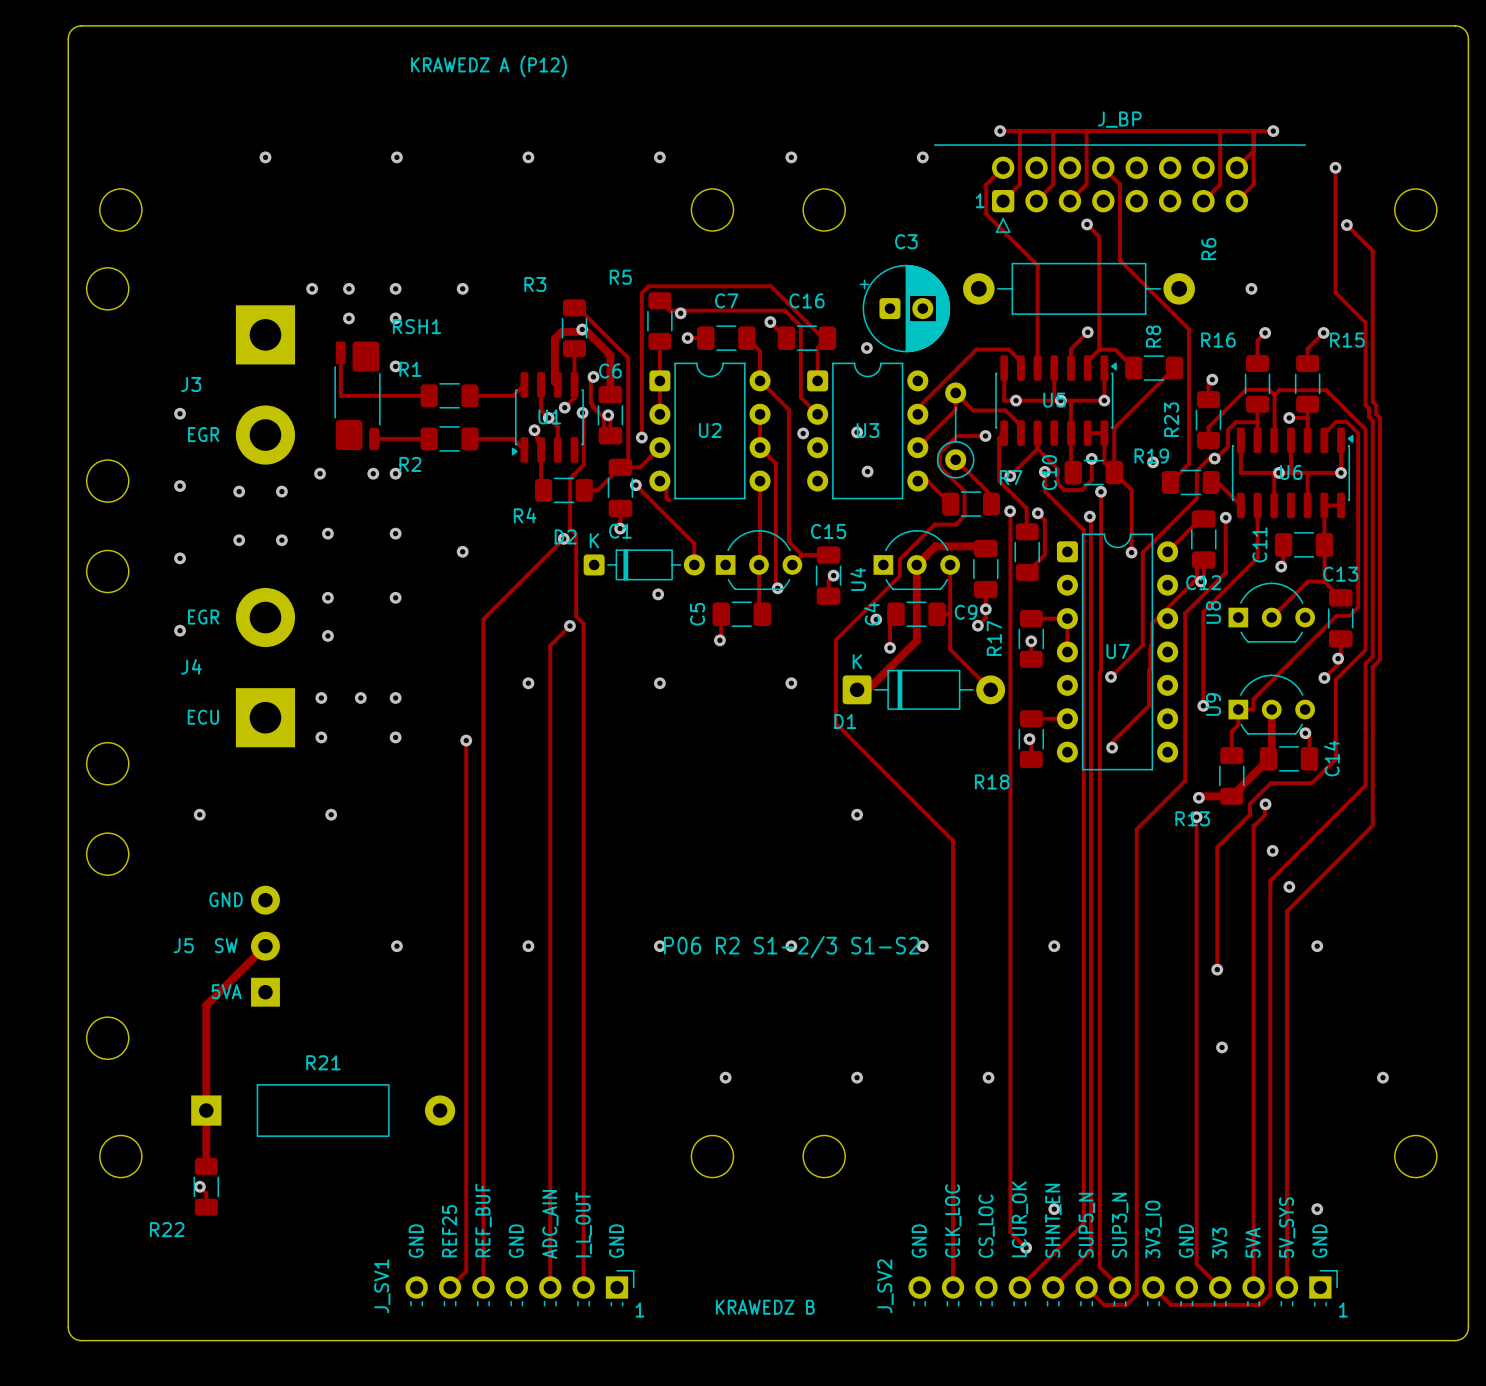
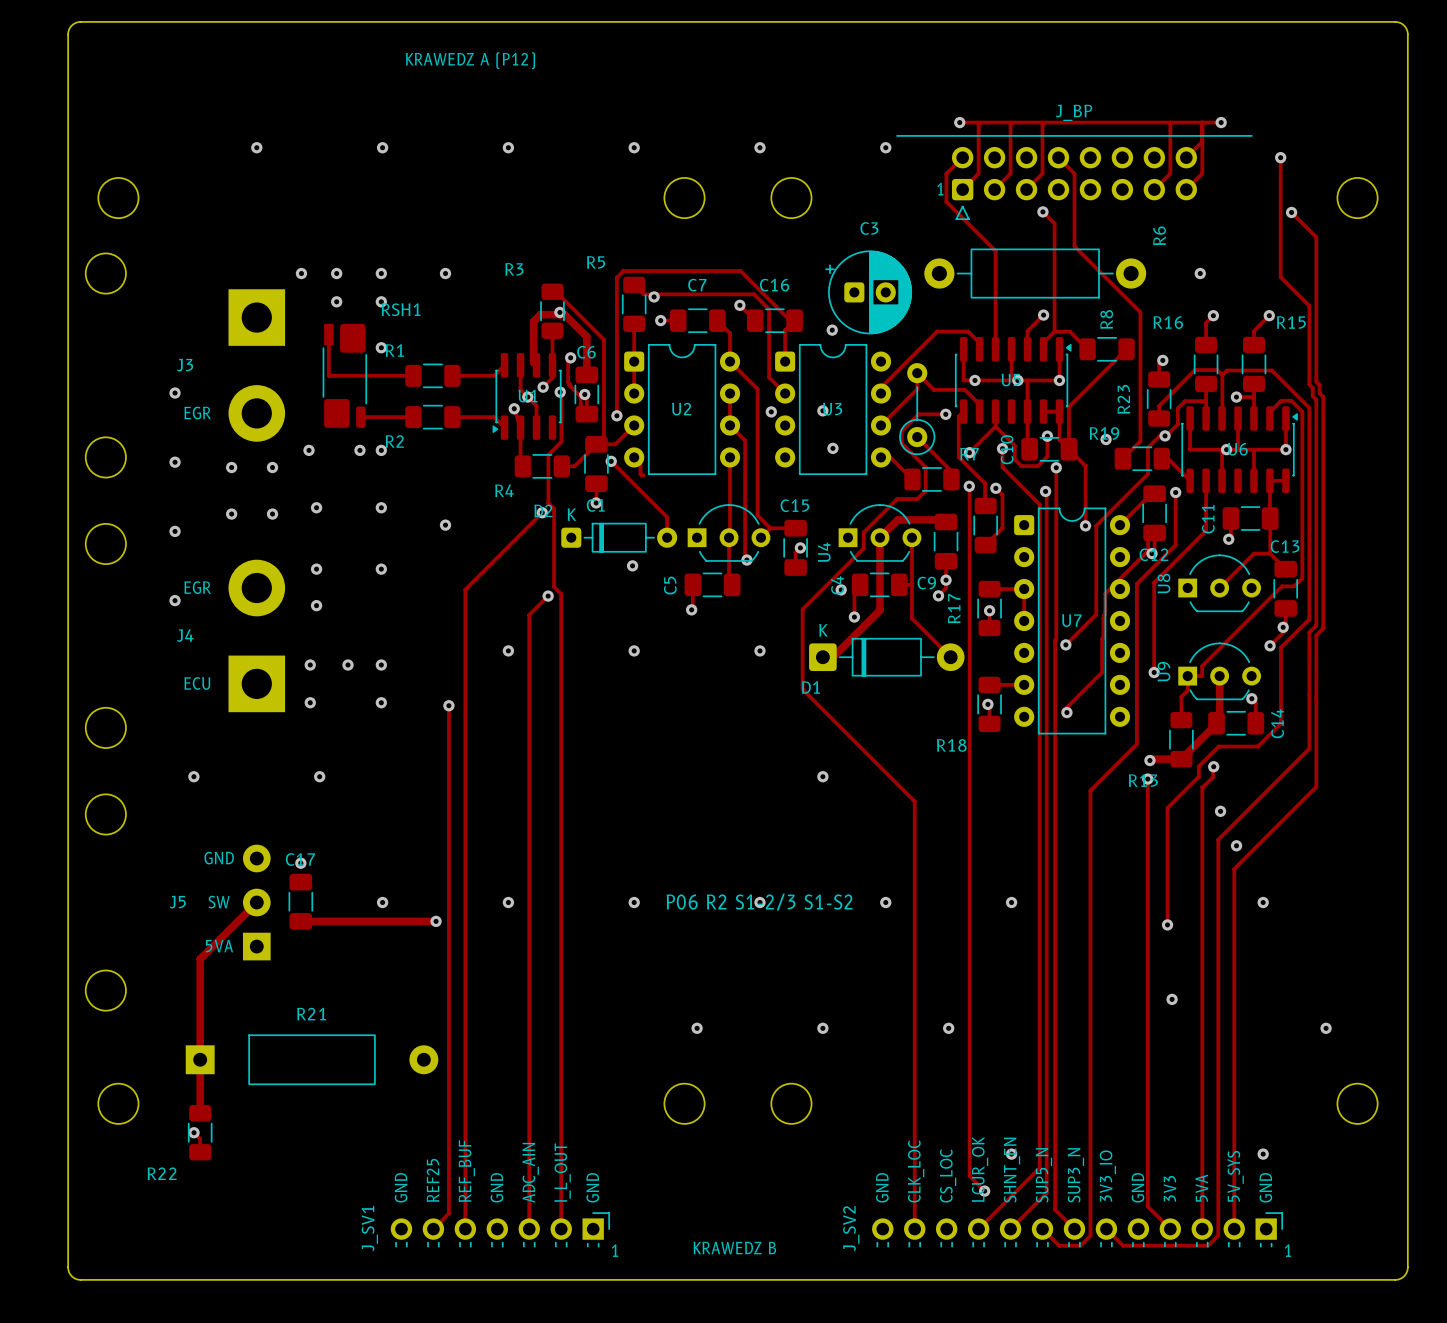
via: none -> (300, 863)
C17: none -> (300, 901)
track: none -> (300, 921) (436, 921)
via: none -> (436, 921)

